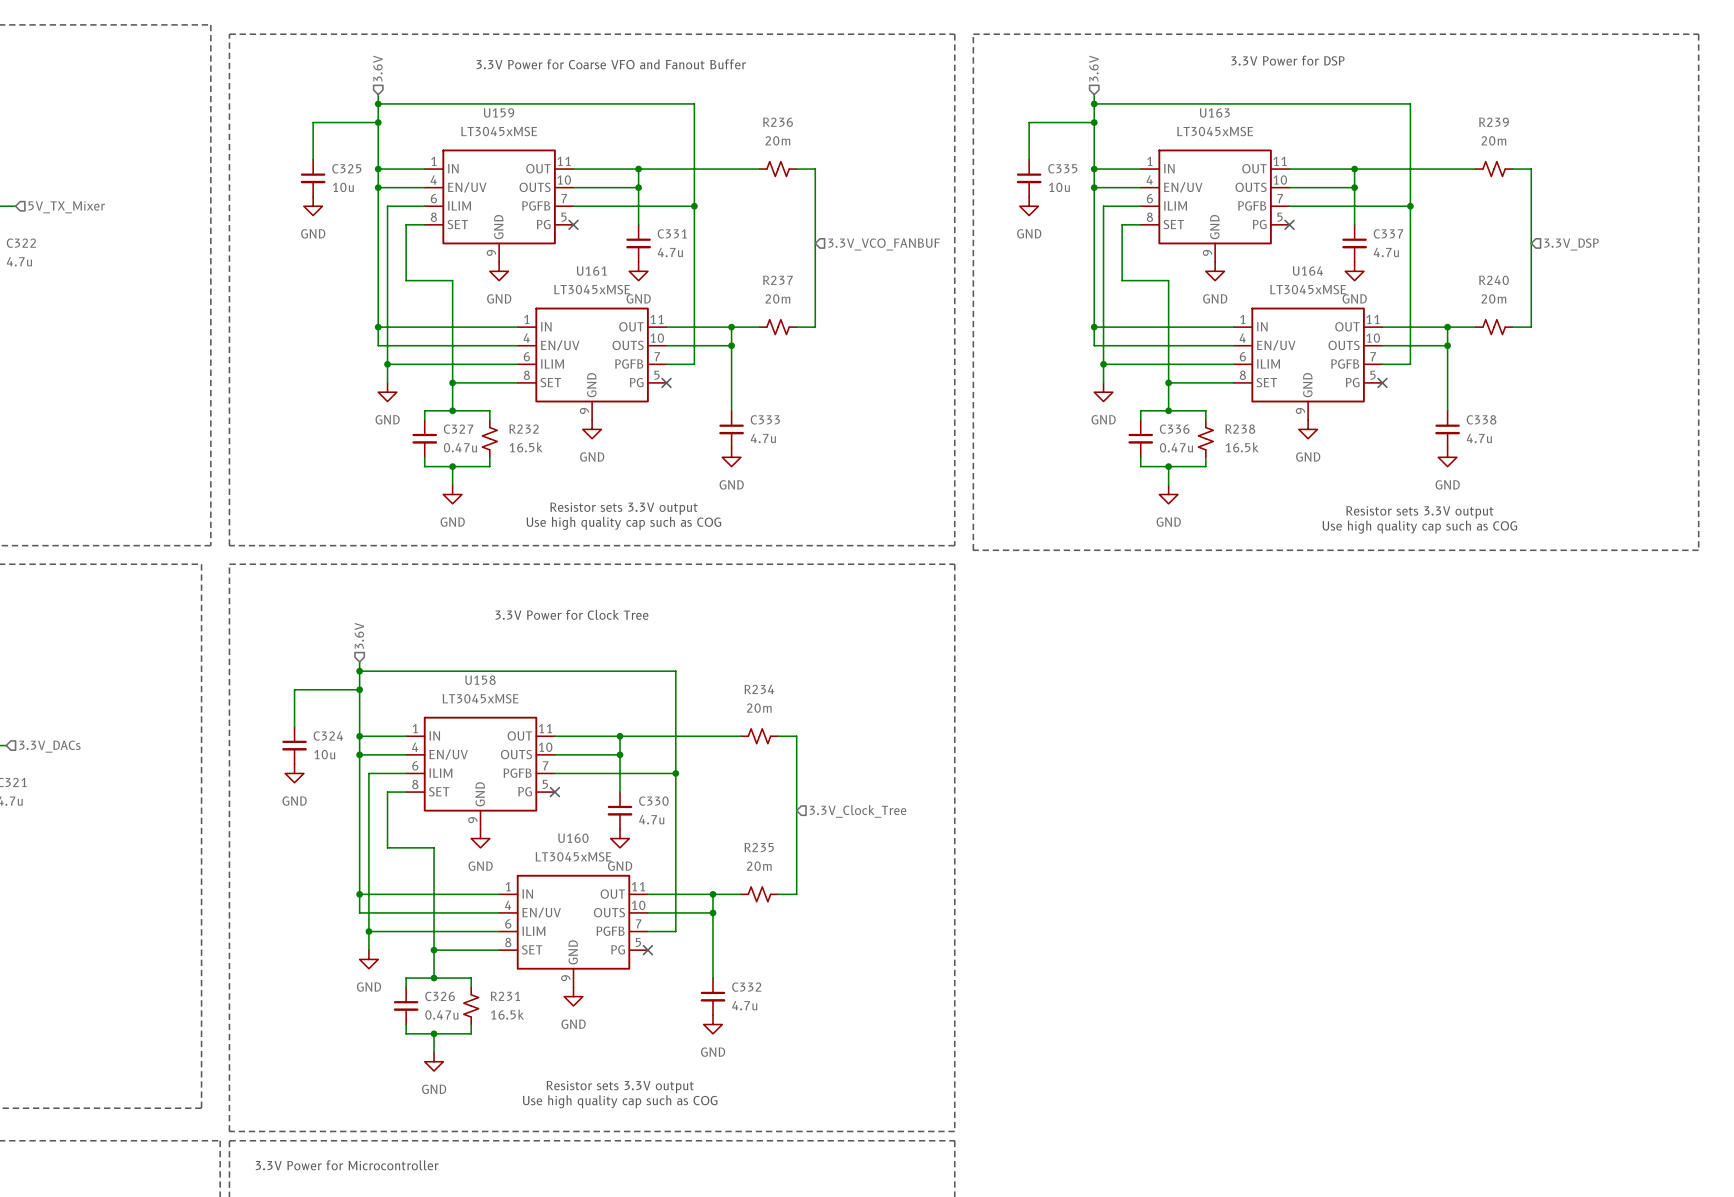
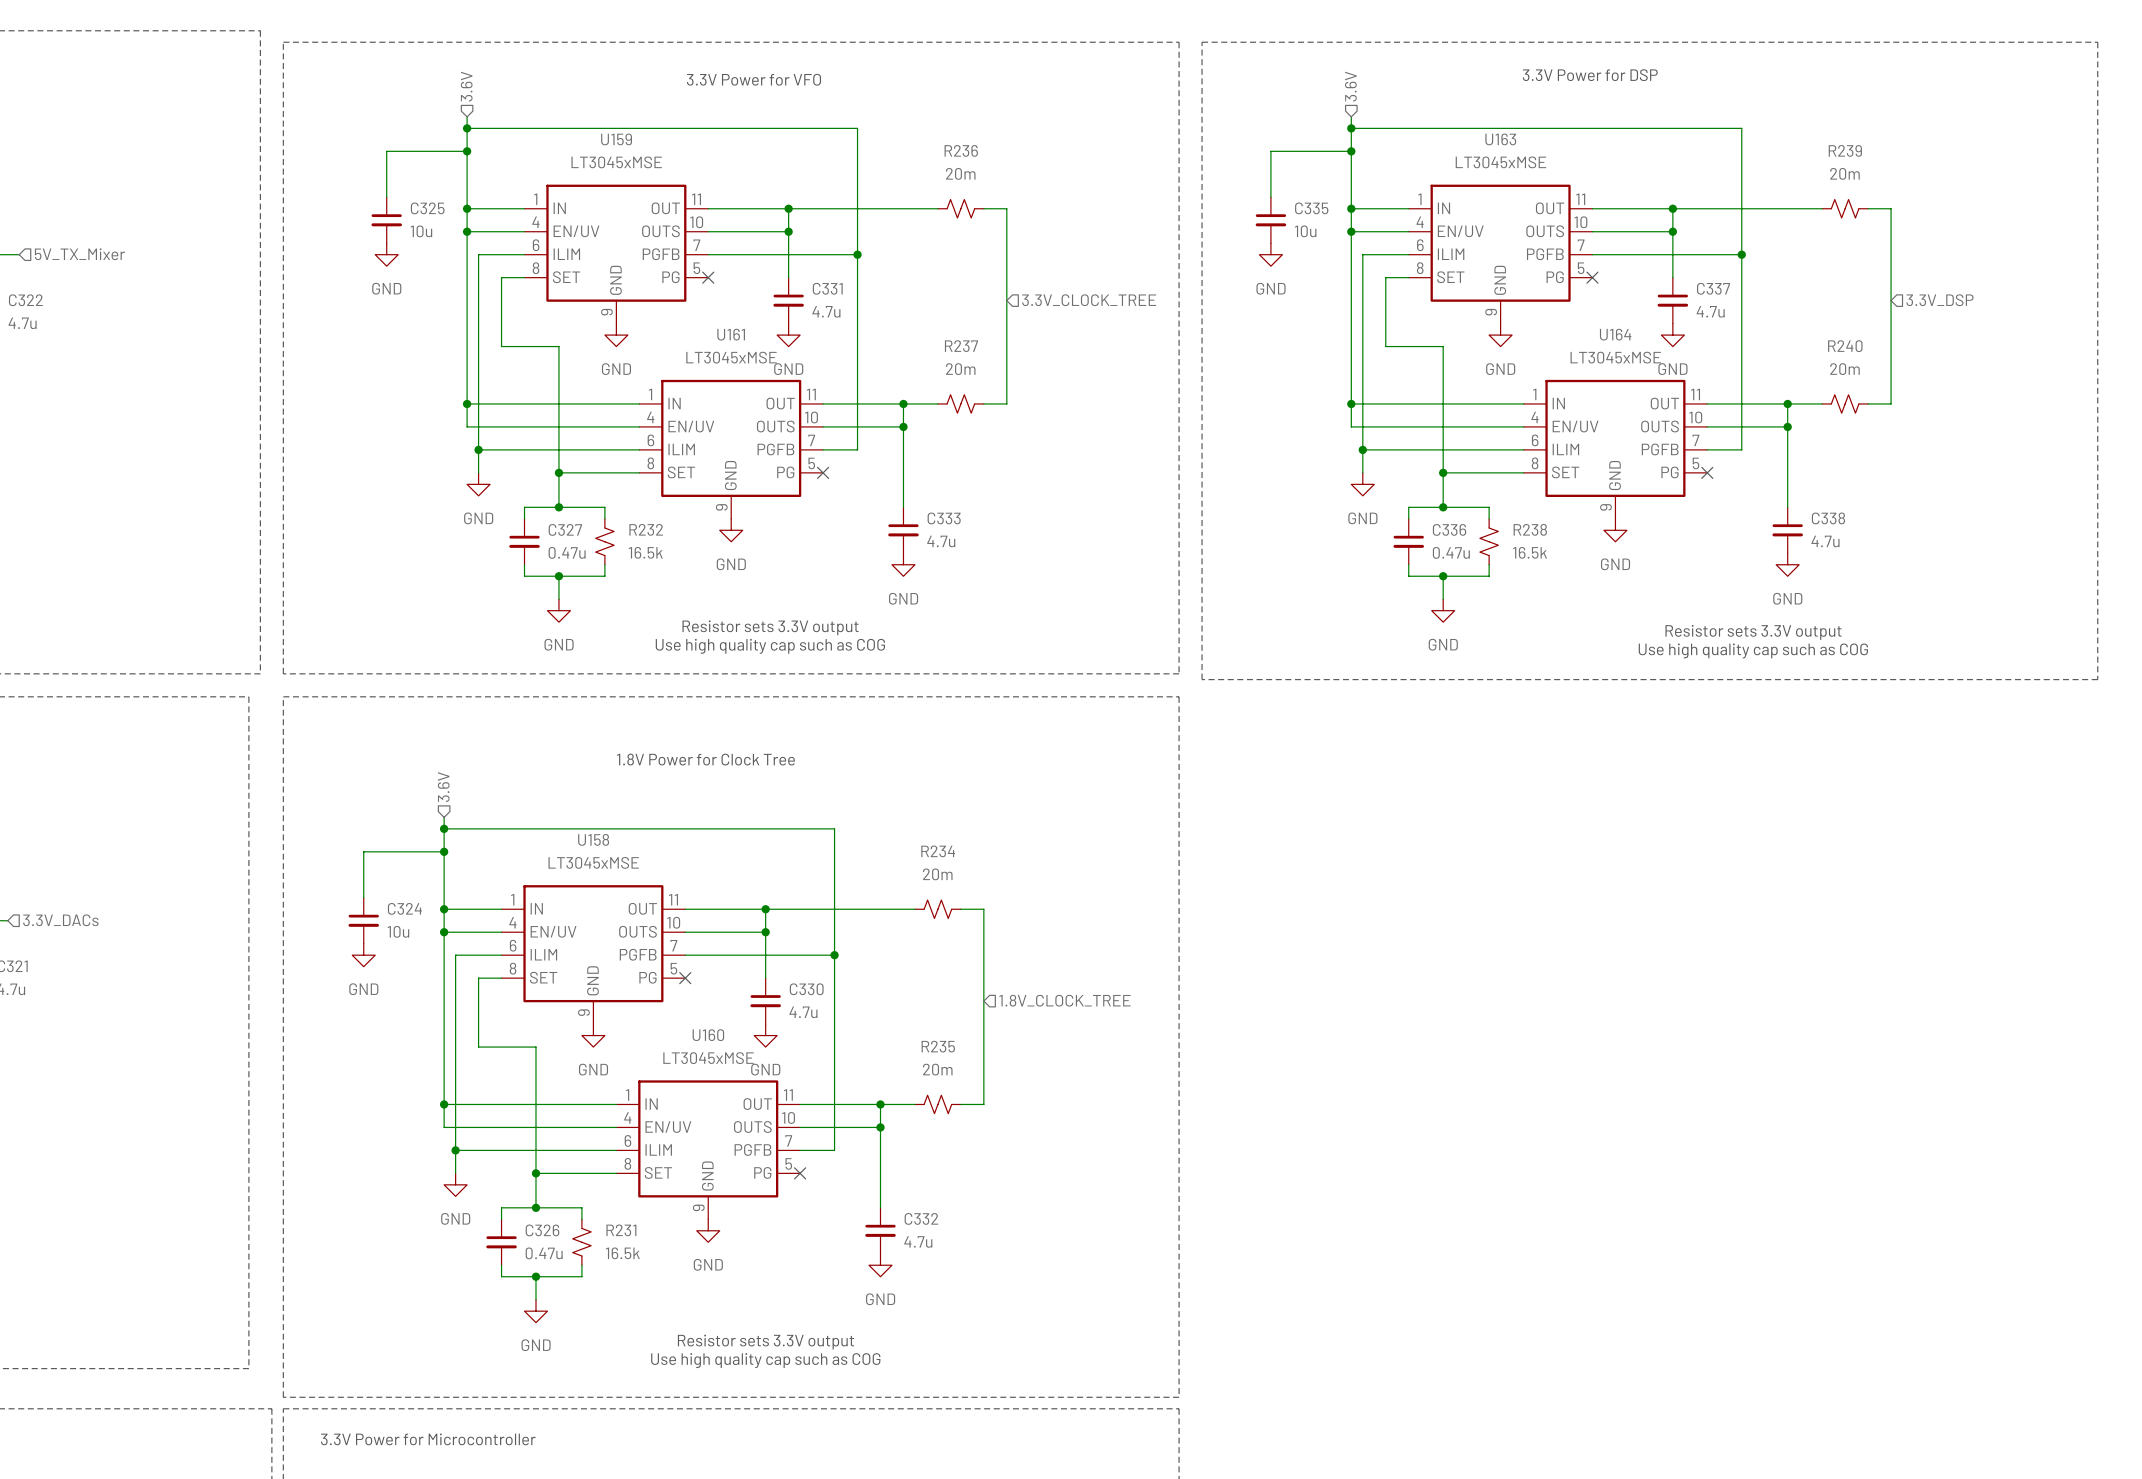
text: 3.3V Power for Coarse VFO and Fanout Buffer (611, 64) -> 3.3V Power for VFO (753, 79)
hierarchical label: 3.3V_VCO_FANBUF (884, 244) -> 3.3V_CLOCK_TREE (1089, 300)
text: 3.3V Power for Clock Tree (571, 614) -> 1.8V Power for Clock Tree (705, 759)
hierarchical label: 3.3V_Clock_Tree (858, 811) -> 1.8V_CLOCK_TREE (1064, 1000)

